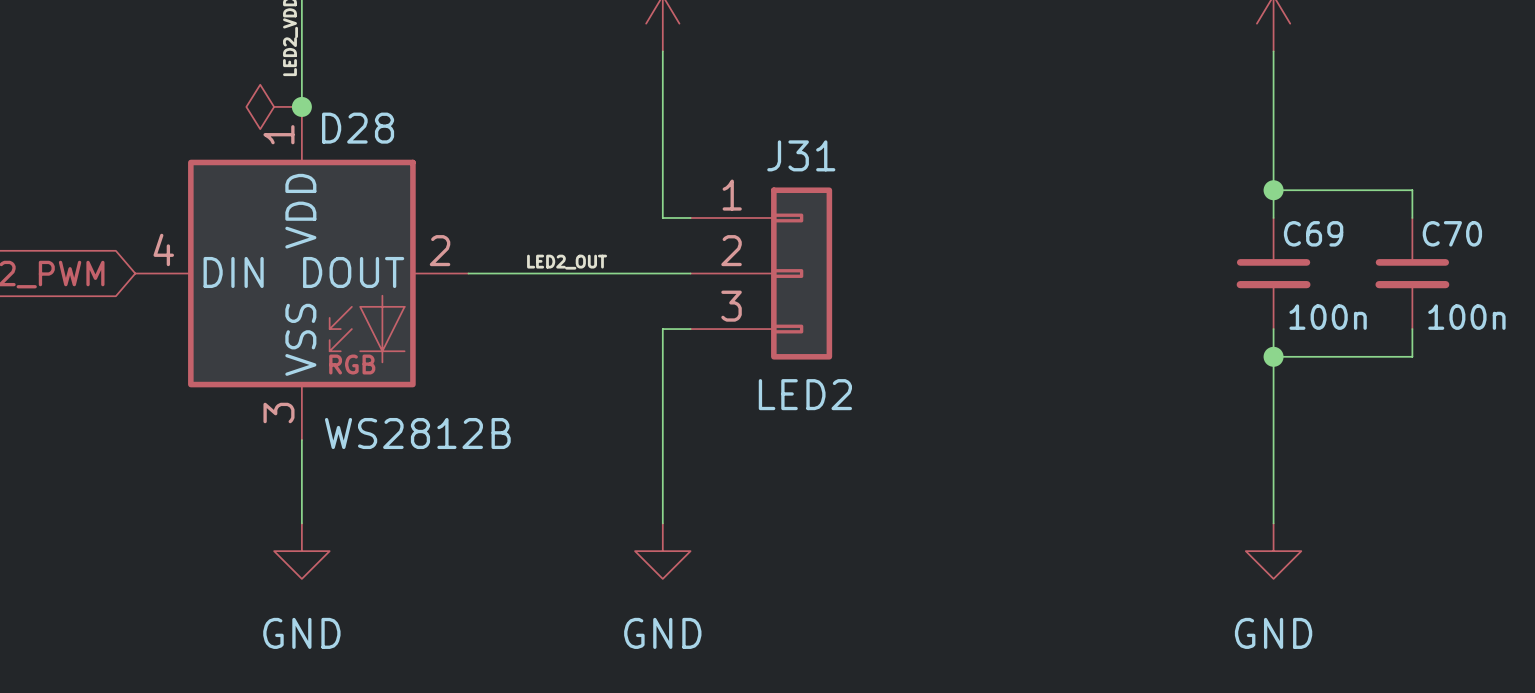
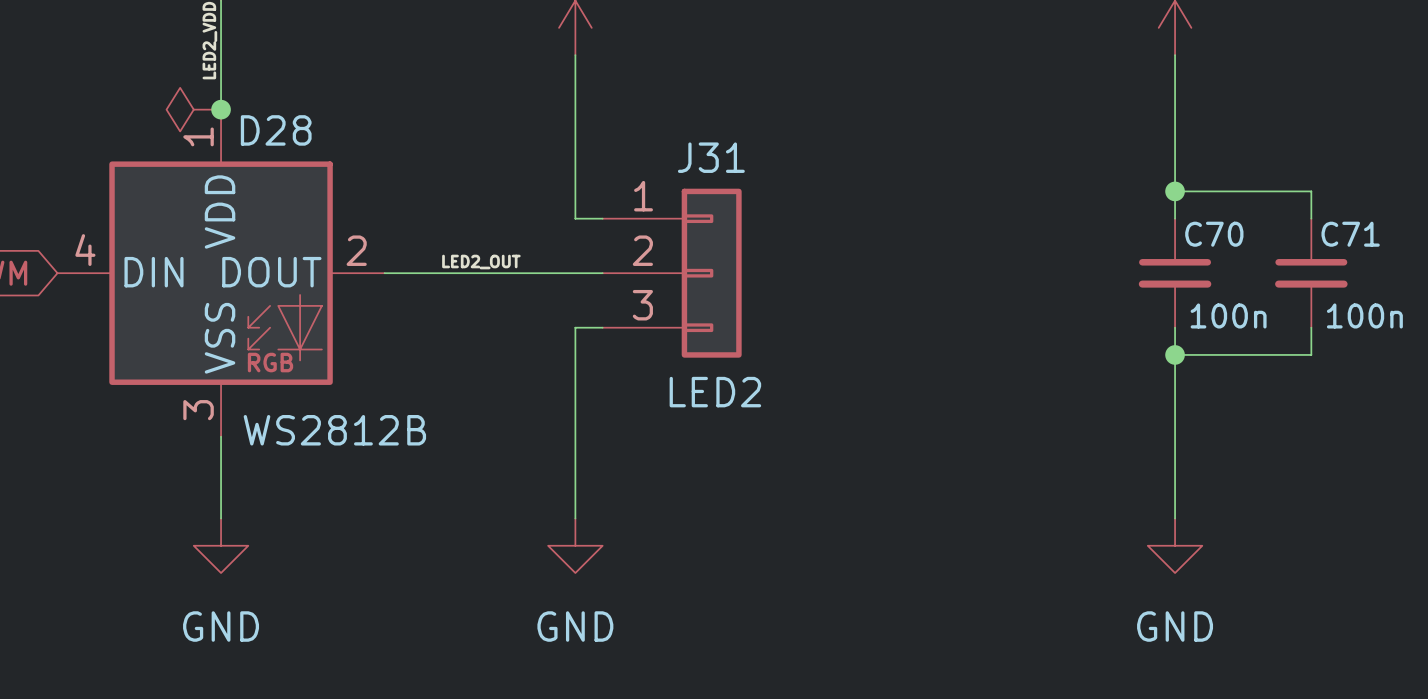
C69 name: C69 (1313, 233) -> C70 (1214, 234)
C70 name: C70 (1452, 233) -> C71 (1350, 234)

